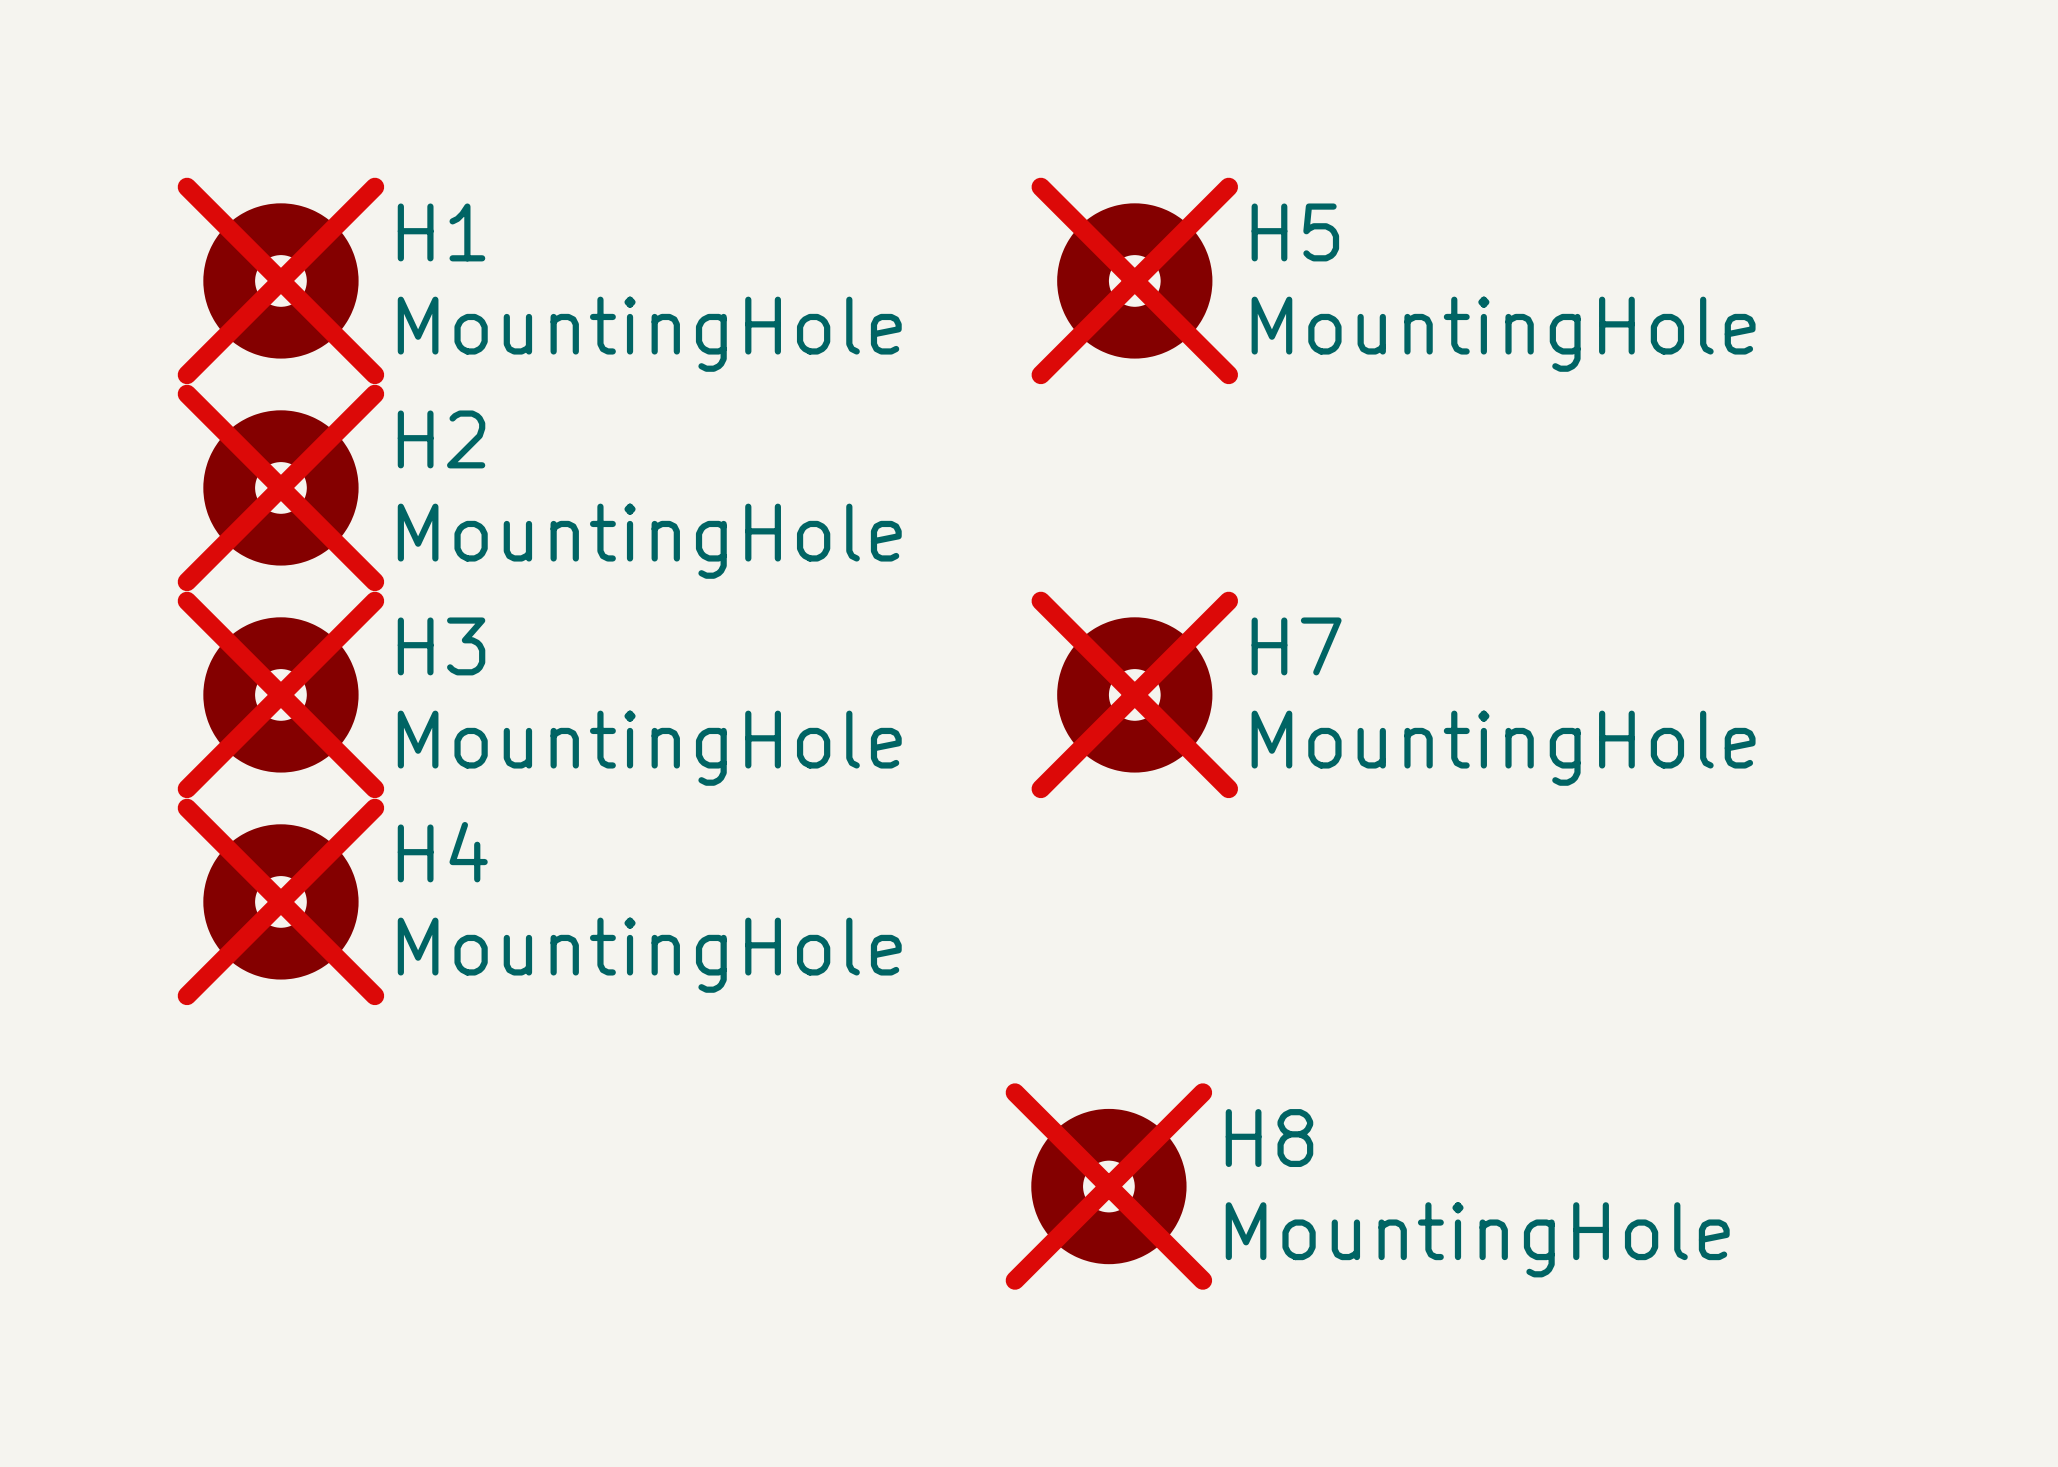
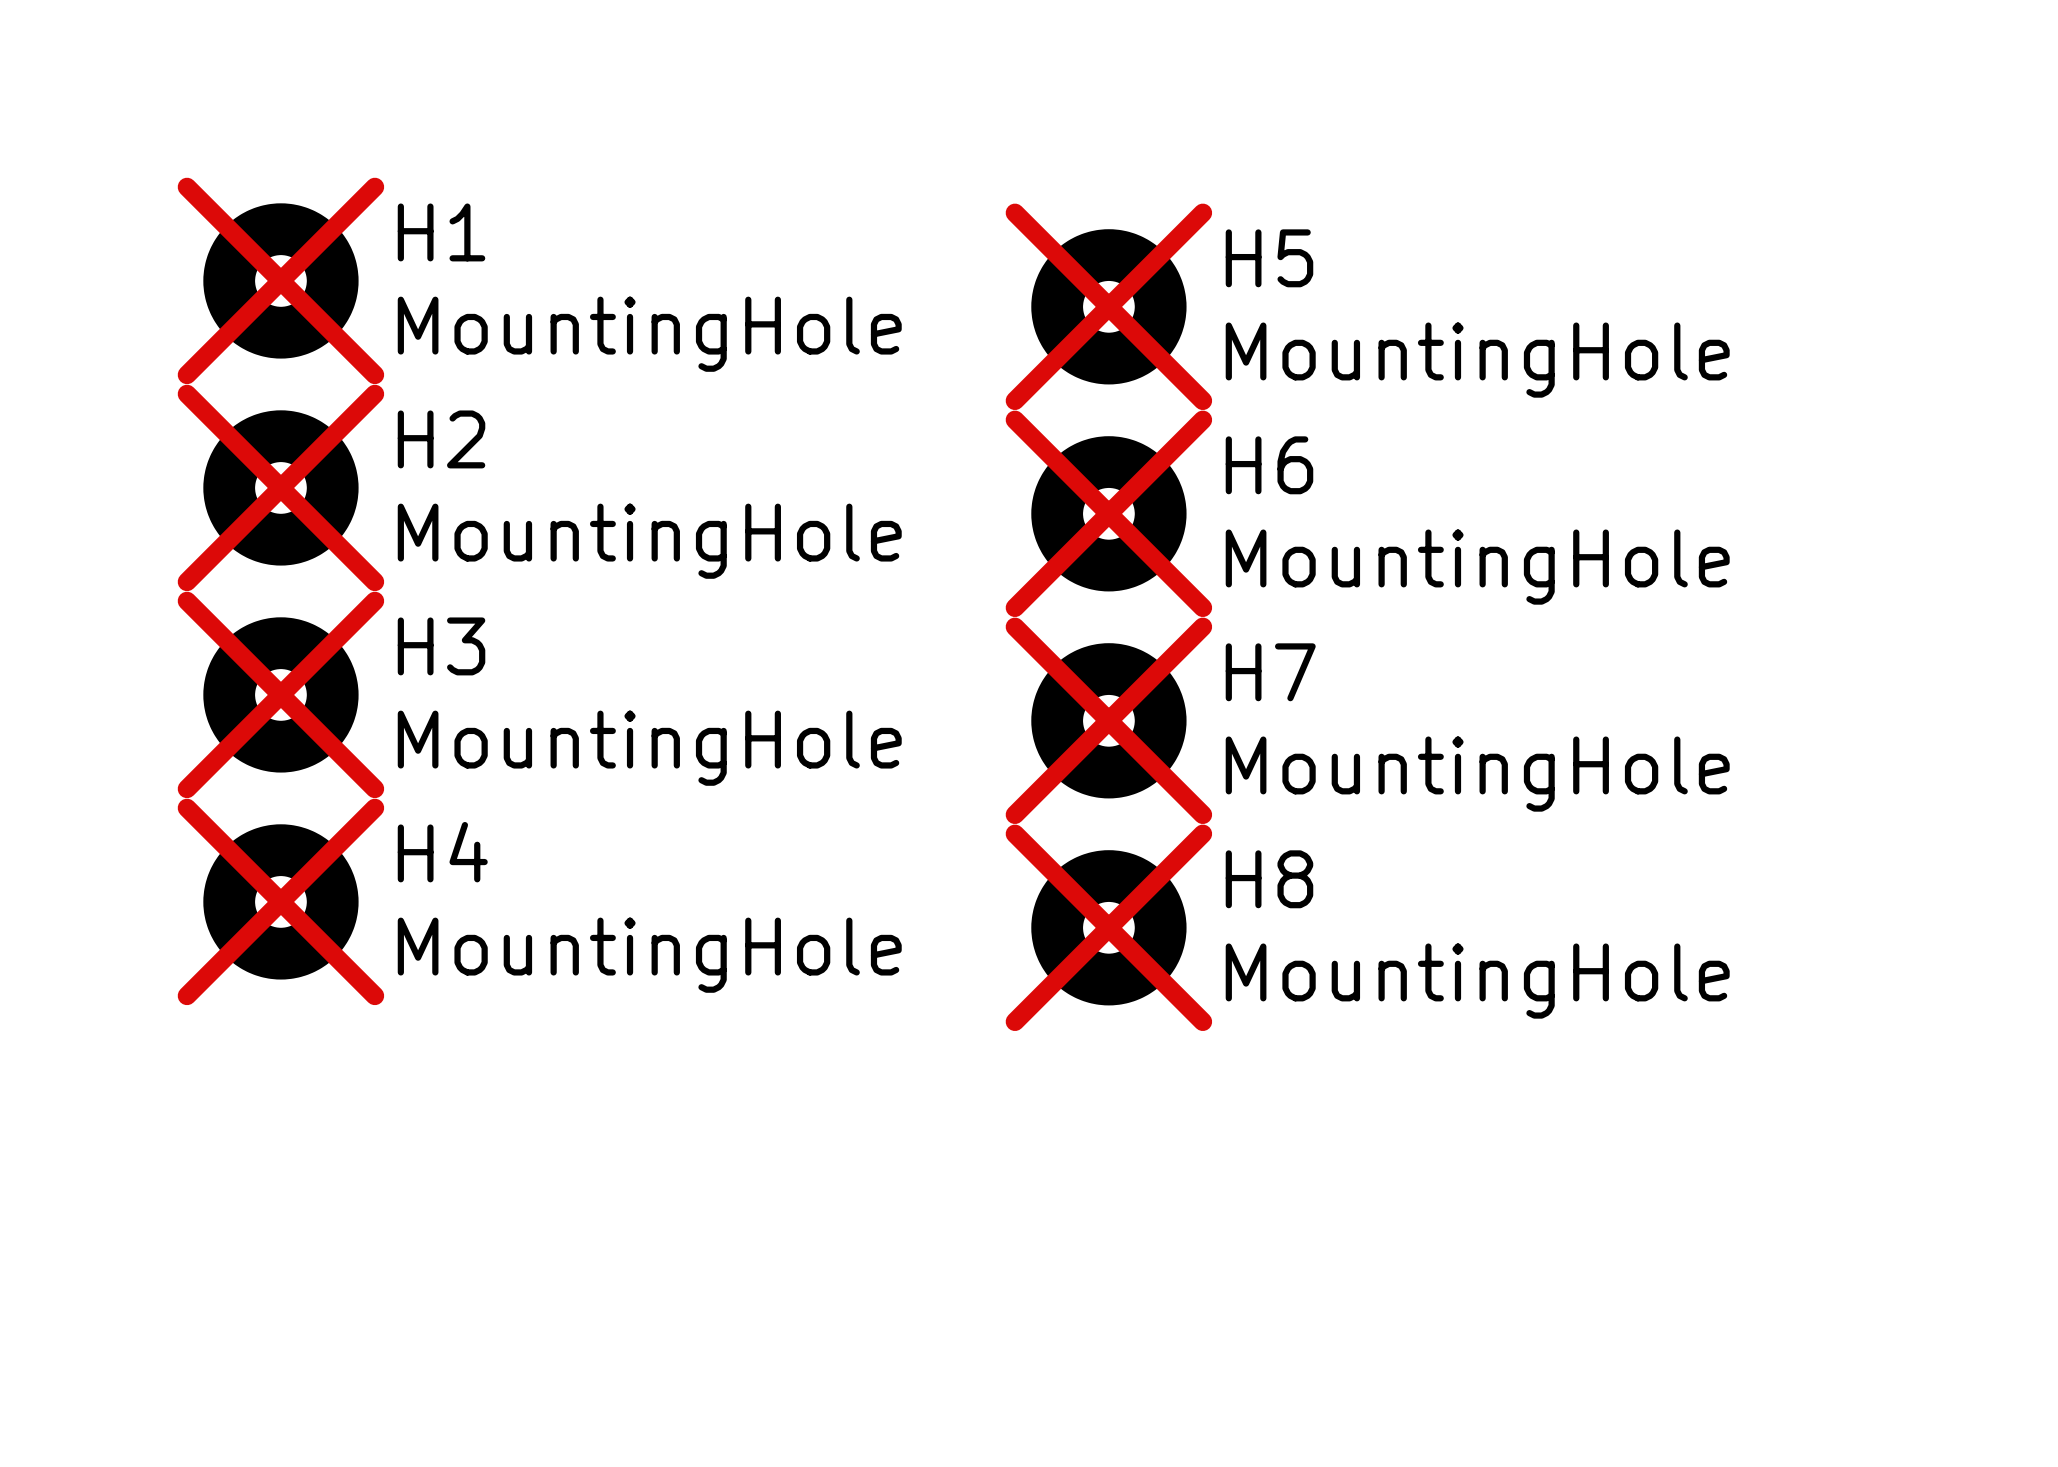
H5 position: (1134, 280) -> (1108, 306)
H6: none -> MountingHole (1108, 513)
H7 position: (1134, 694) -> (1108, 720)
H8 position: (1108, 1186) -> (1108, 927)

